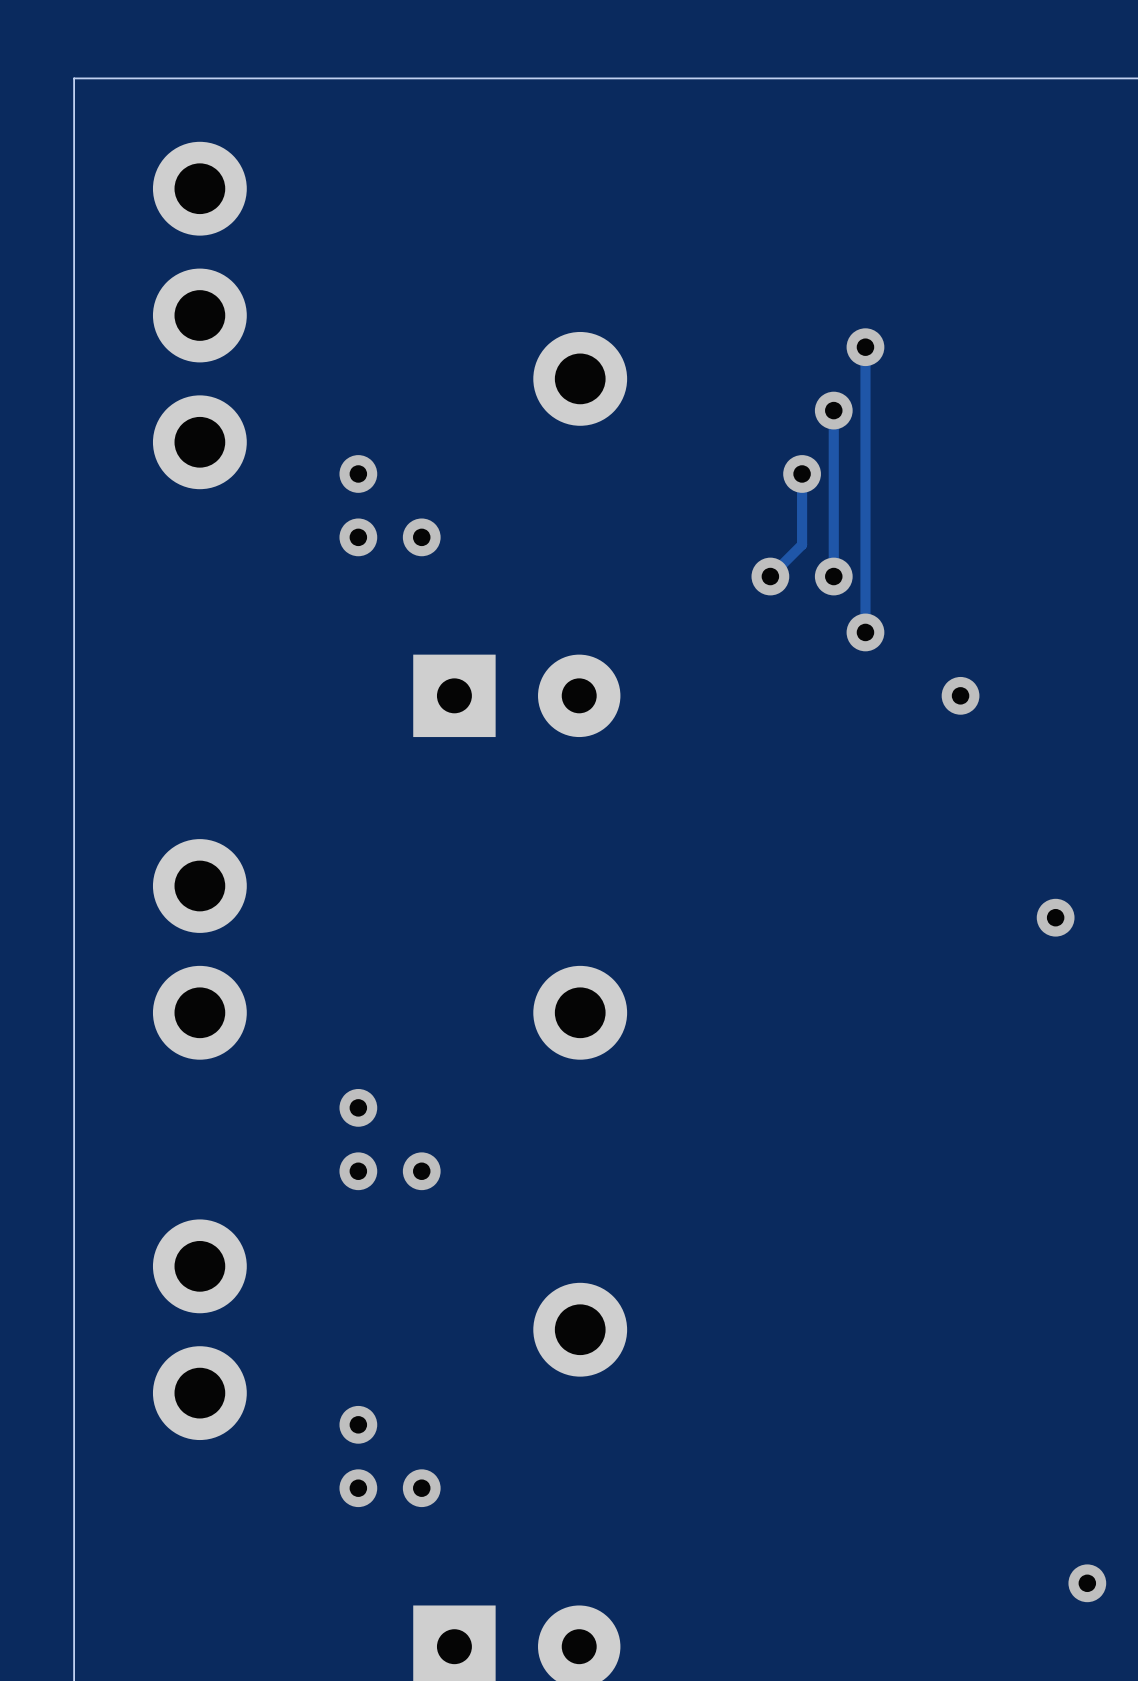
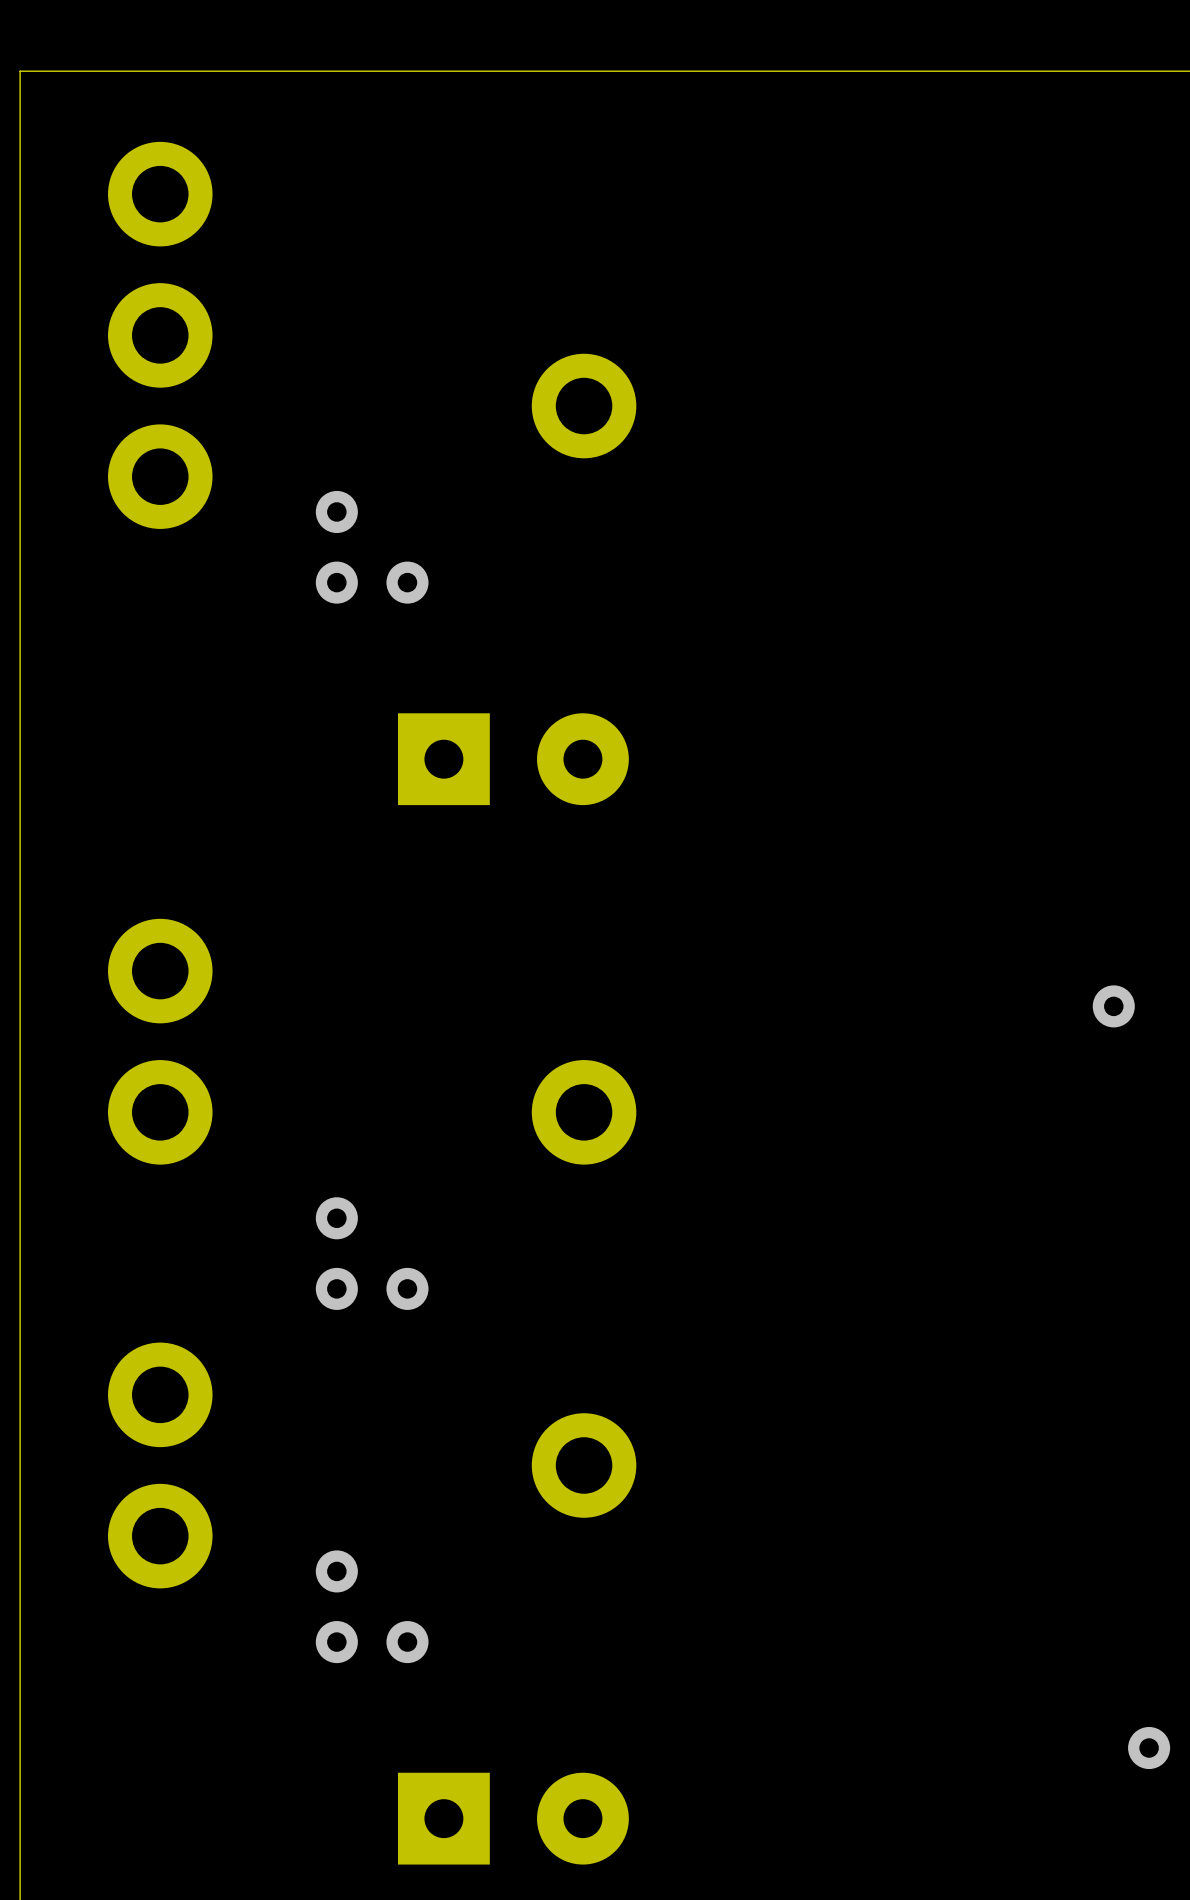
track: (865, 347) (865, 632) -> none
via: (865, 347) -> none
track: (833, 410) (833, 576) -> none
via: (833, 410) -> none
track: (802, 473) (802, 544) (770, 576) -> none
via: (802, 473) -> none
via: (770, 576) -> none
via: (833, 576) -> none
via: (865, 632) -> none
via: (960, 695) -> none

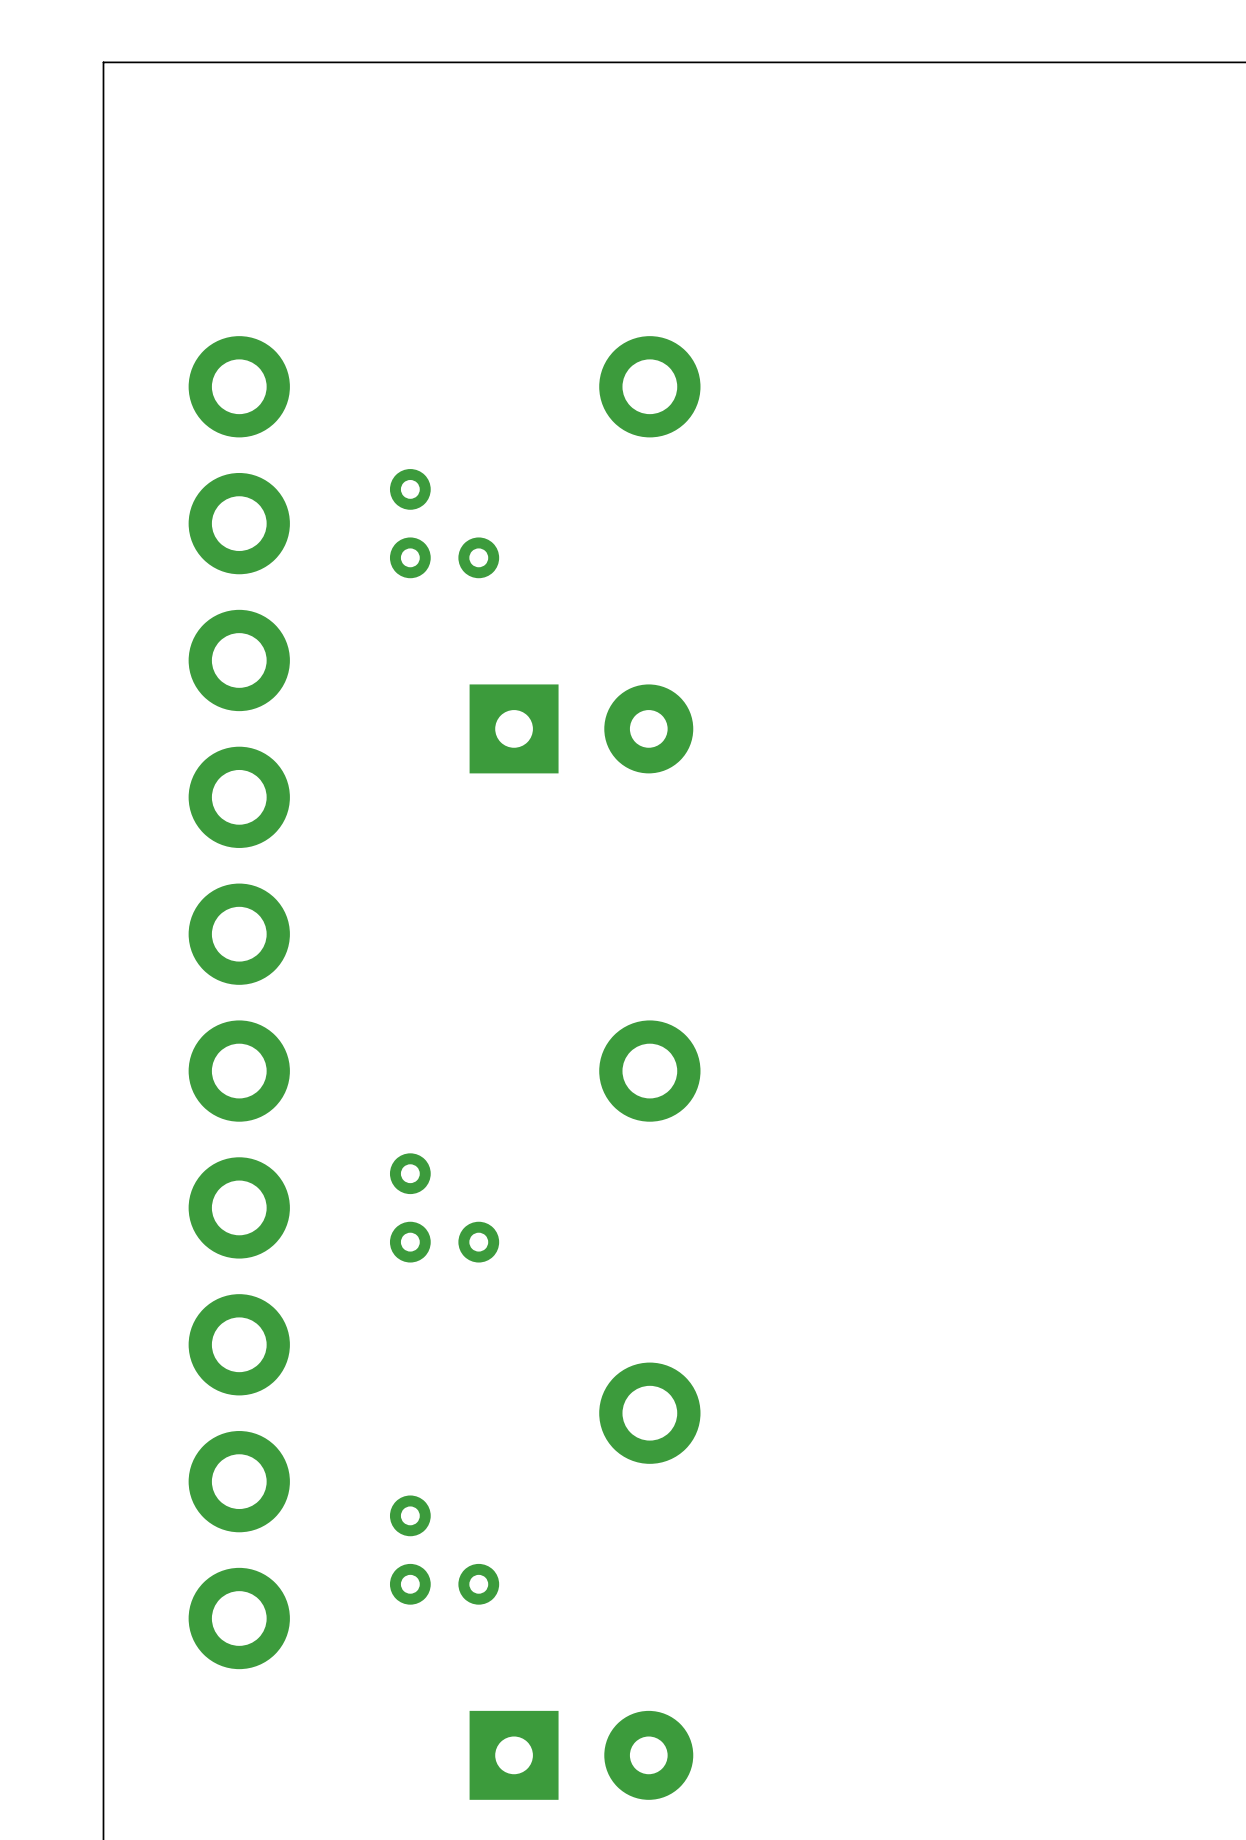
part: (160, 335) -> none
part footprint: [108, 918, 213, 1165] -> [188, 336, 290, 1670]
via: (1113, 1006) -> none
via: (1149, 1748) -> none

